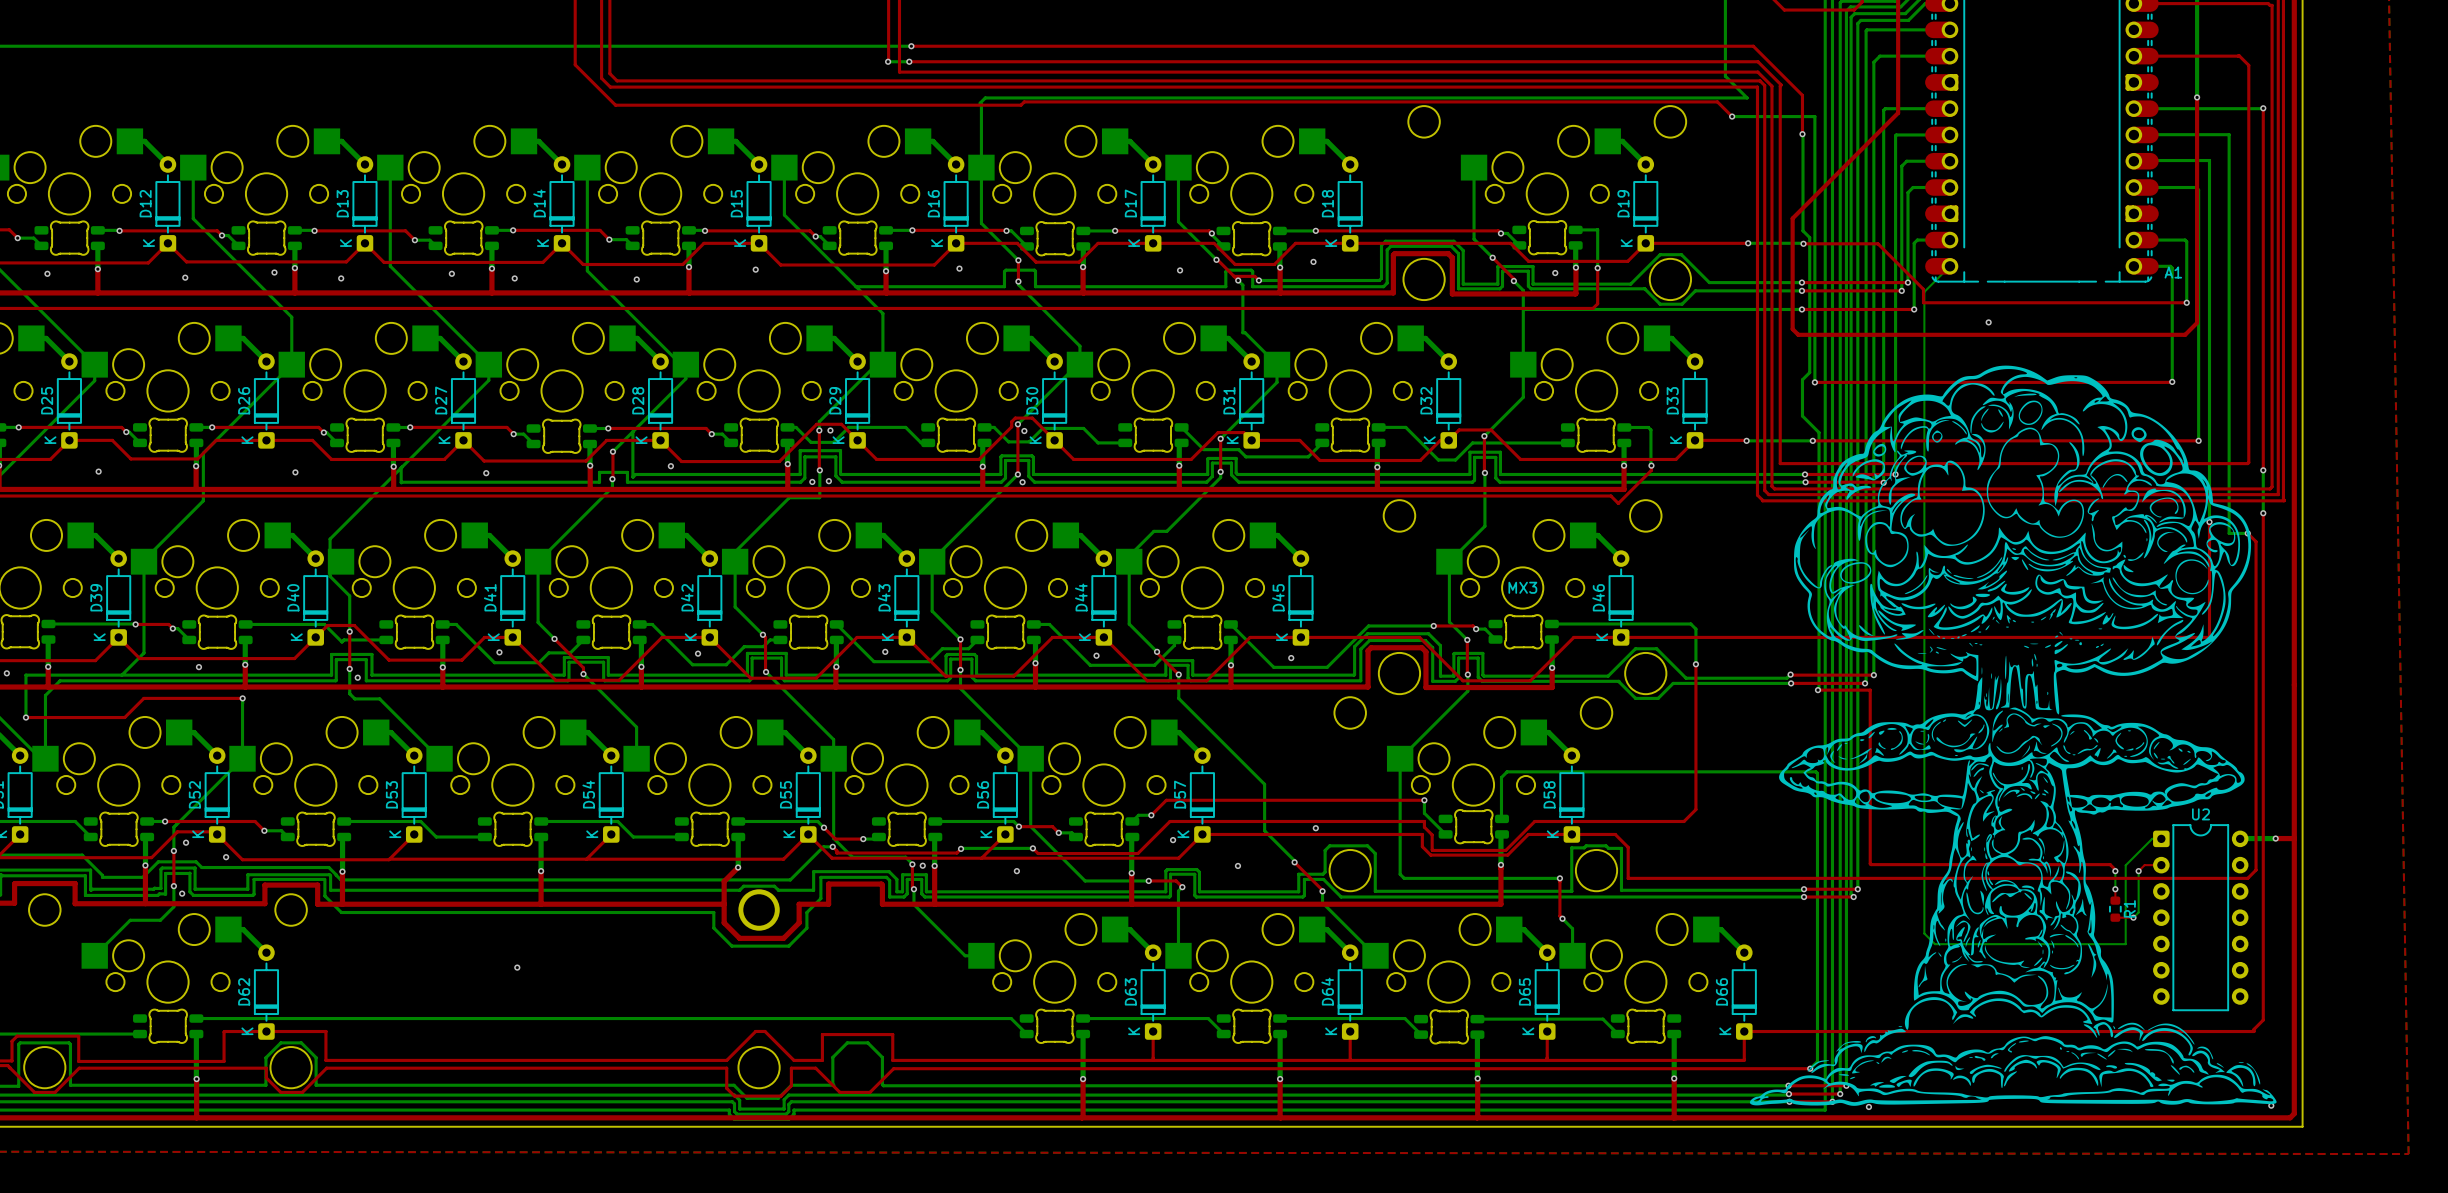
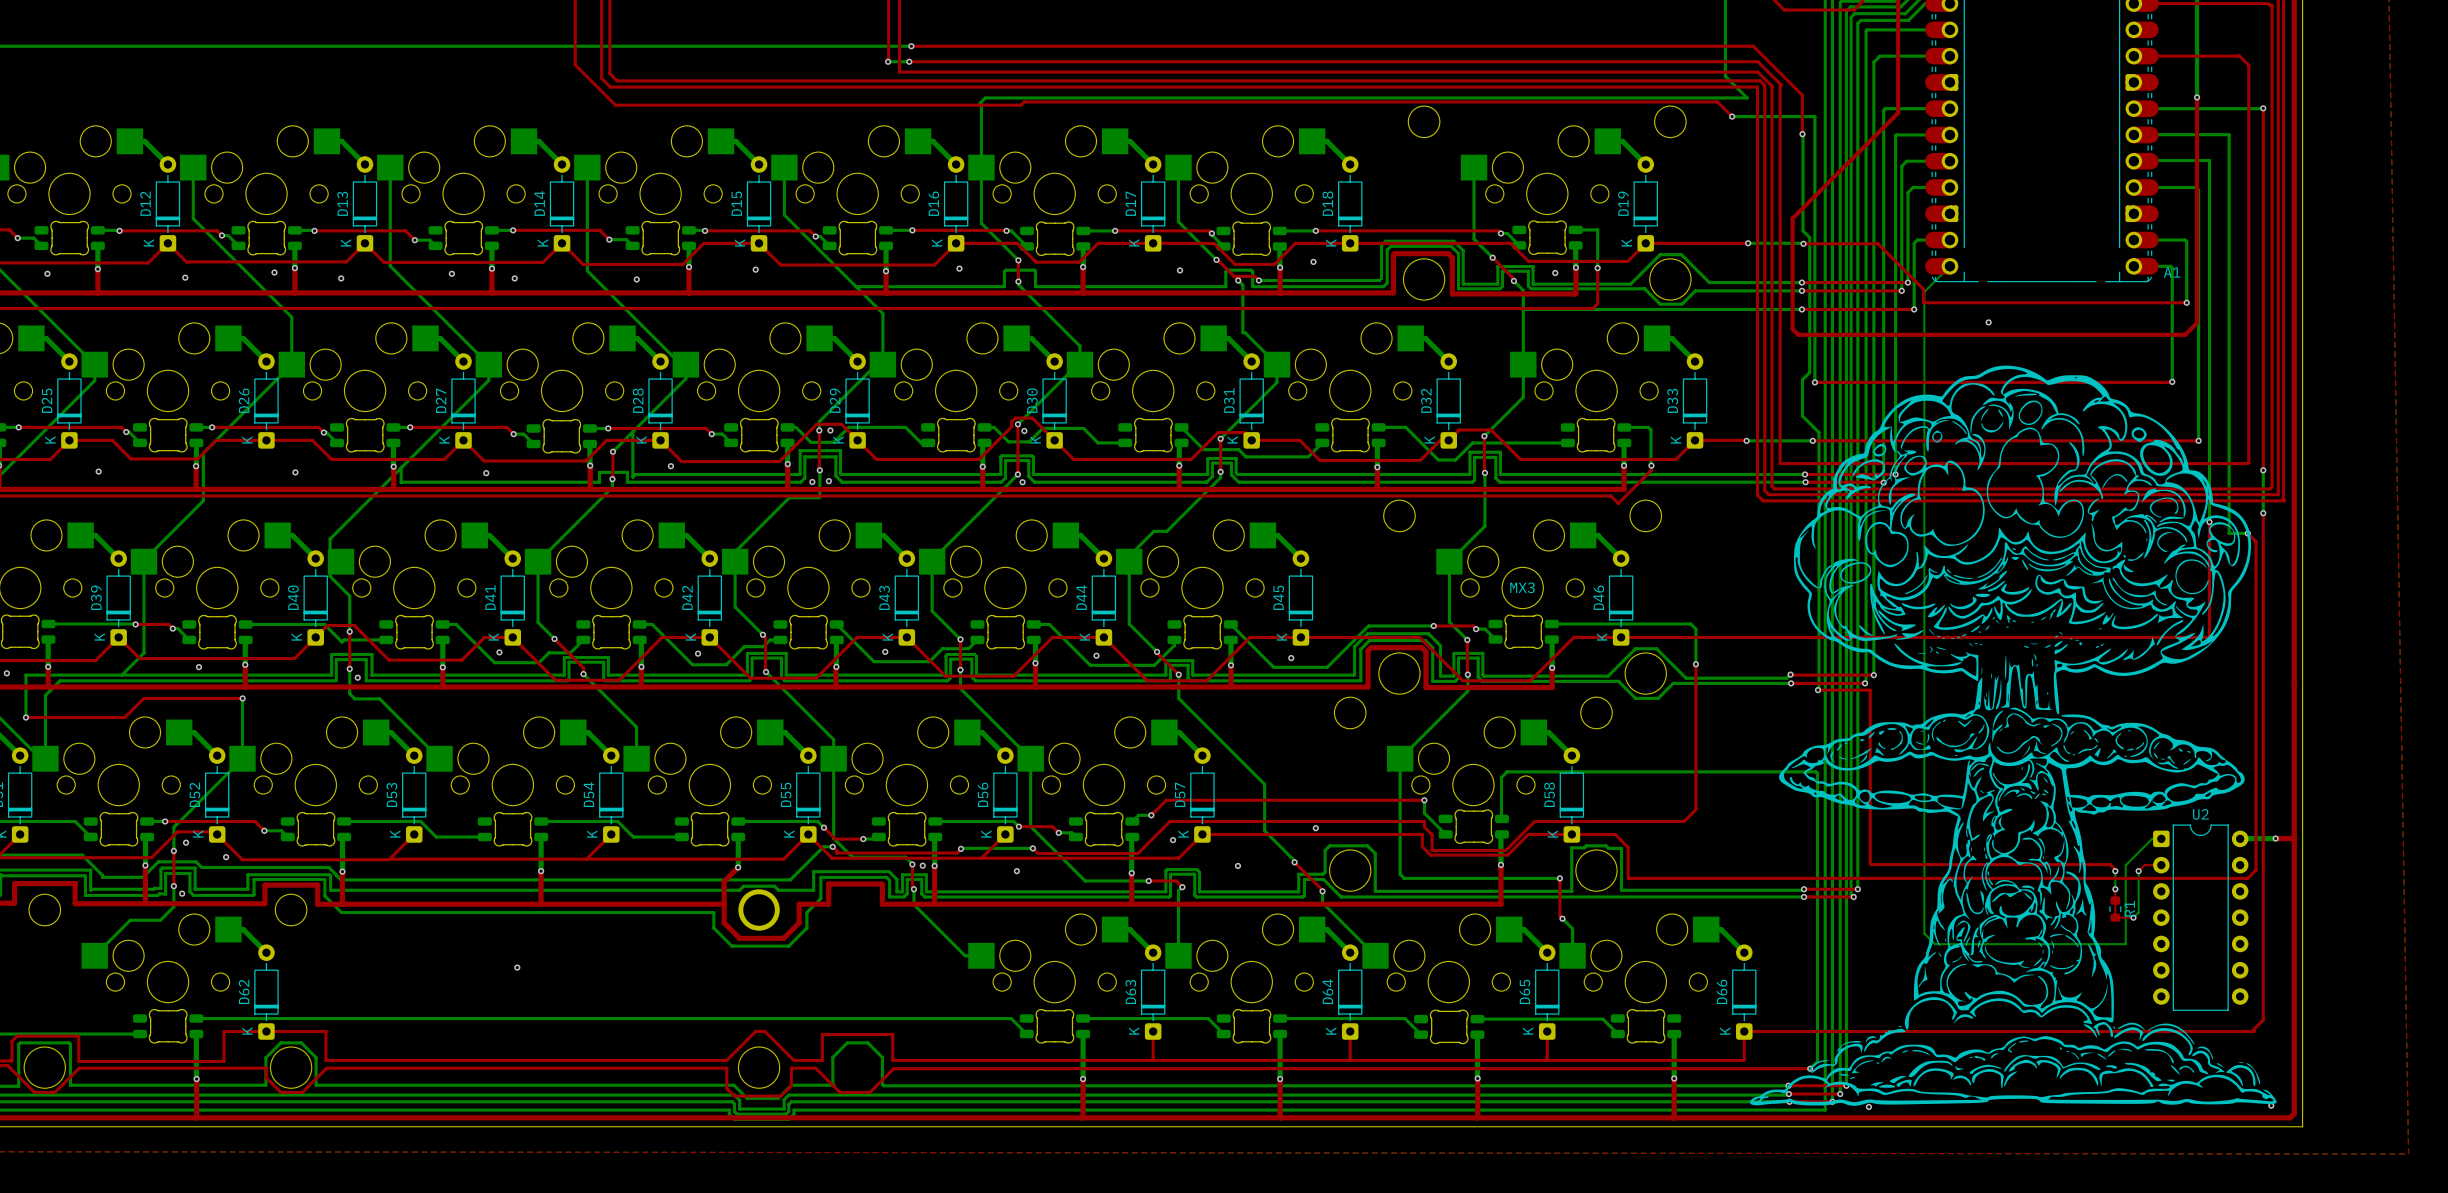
top track: none -> (2115, 900) (2115, 917)

